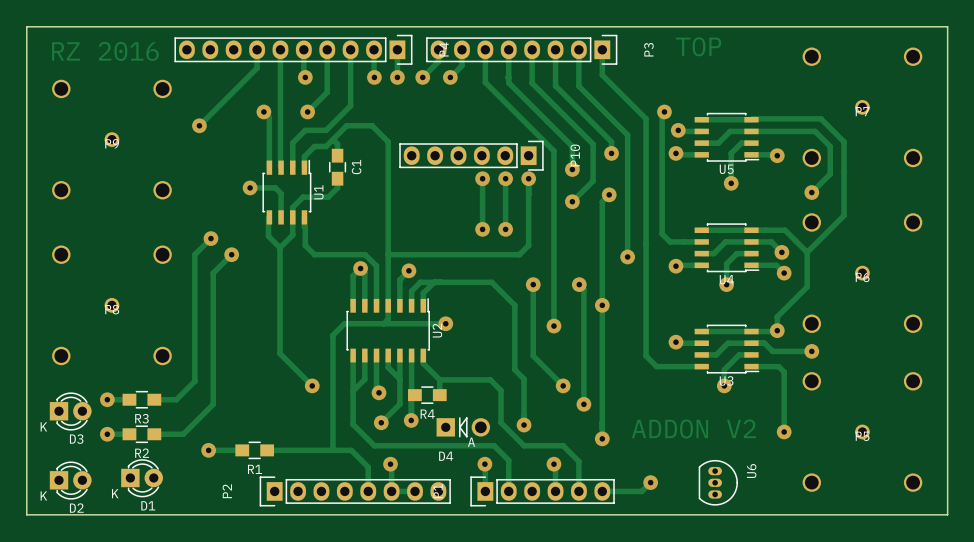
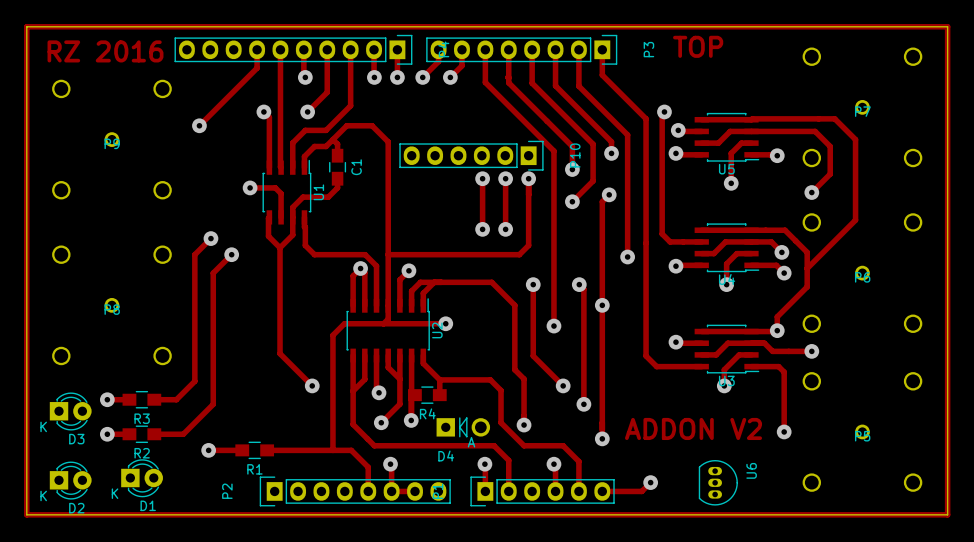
track: none -> (26, 26) (947, 26) (947, 514) (26, 514) (26, 26)
track: (821, 118) (844, 141) (844, 215) (807, 252) -> (821, 118) (834, 118) (855, 139) (855, 220) (807, 268)

